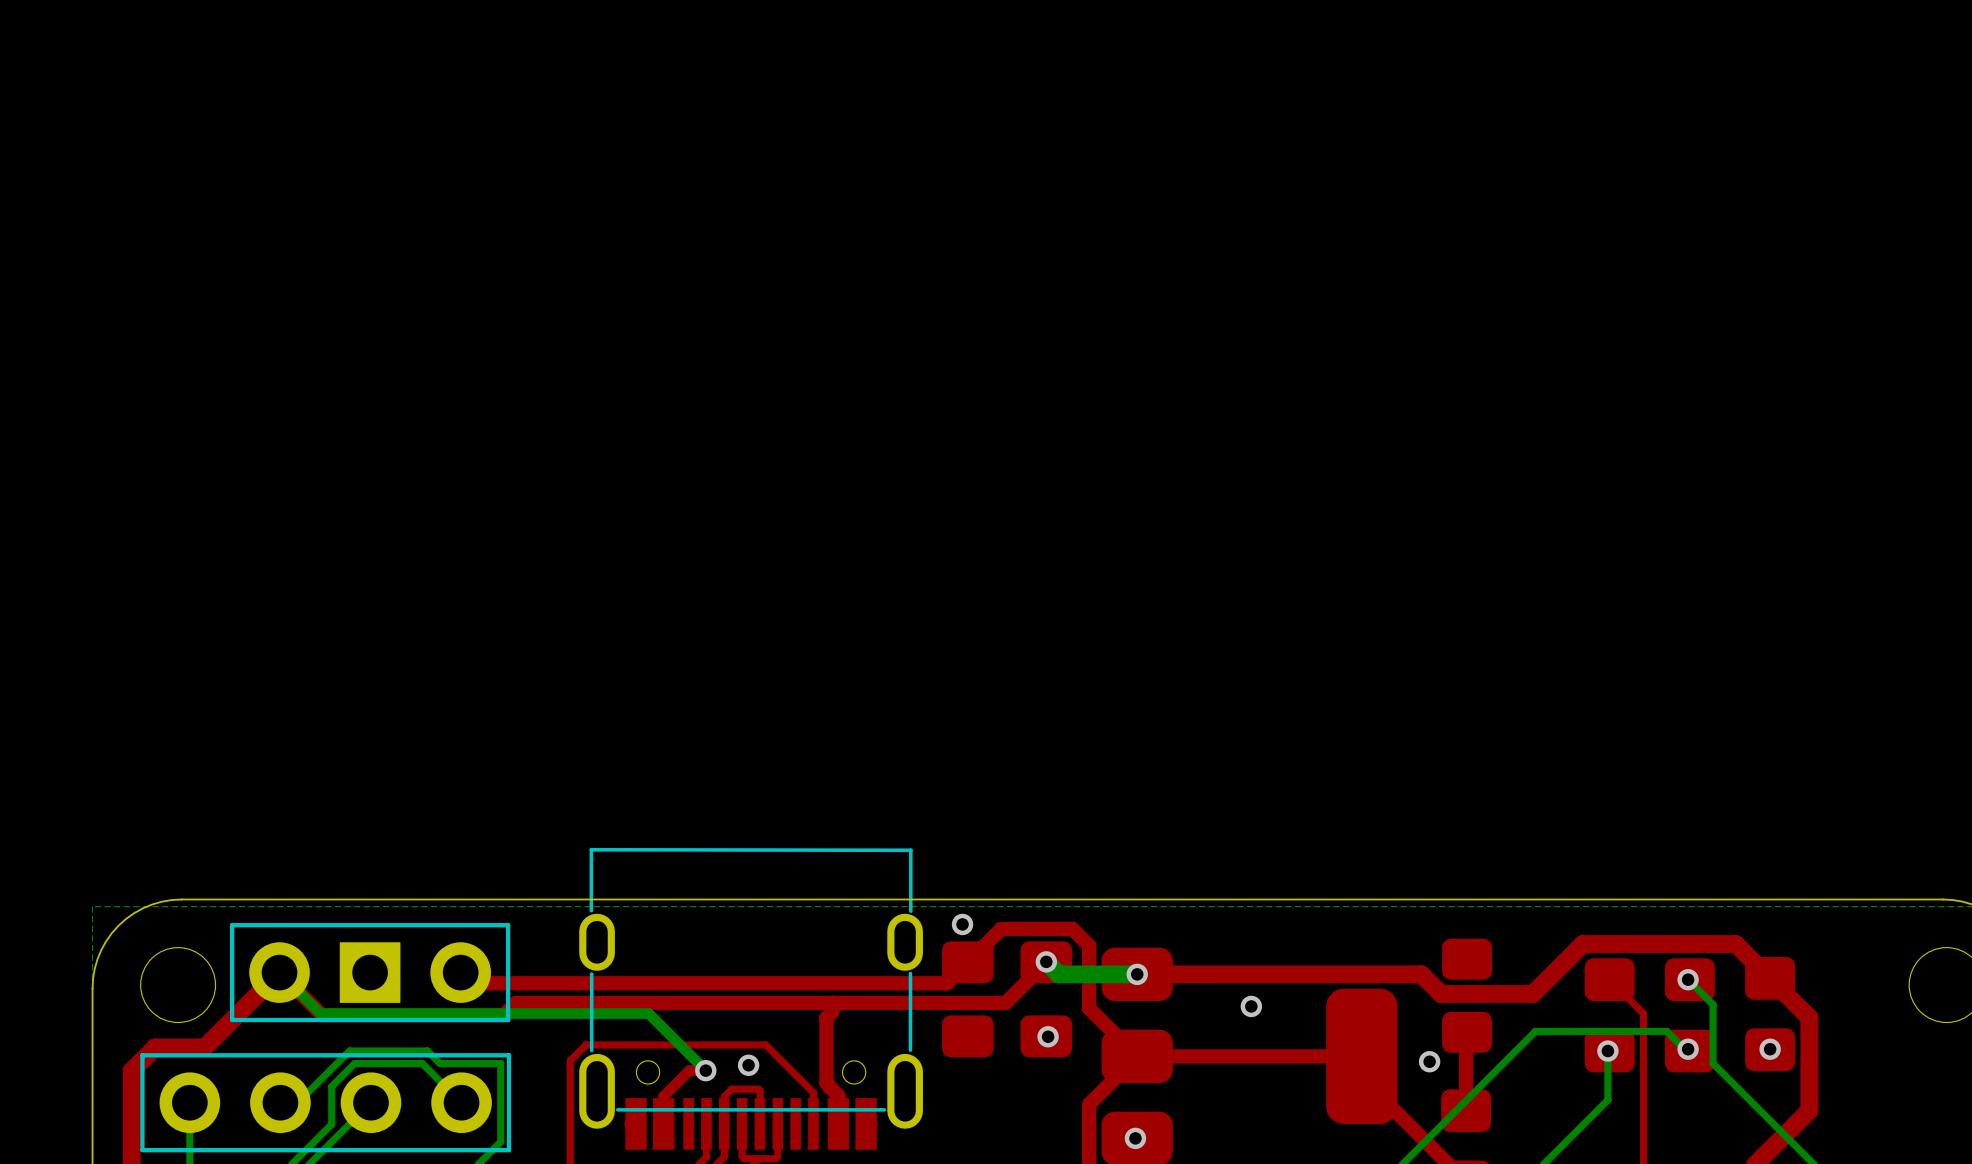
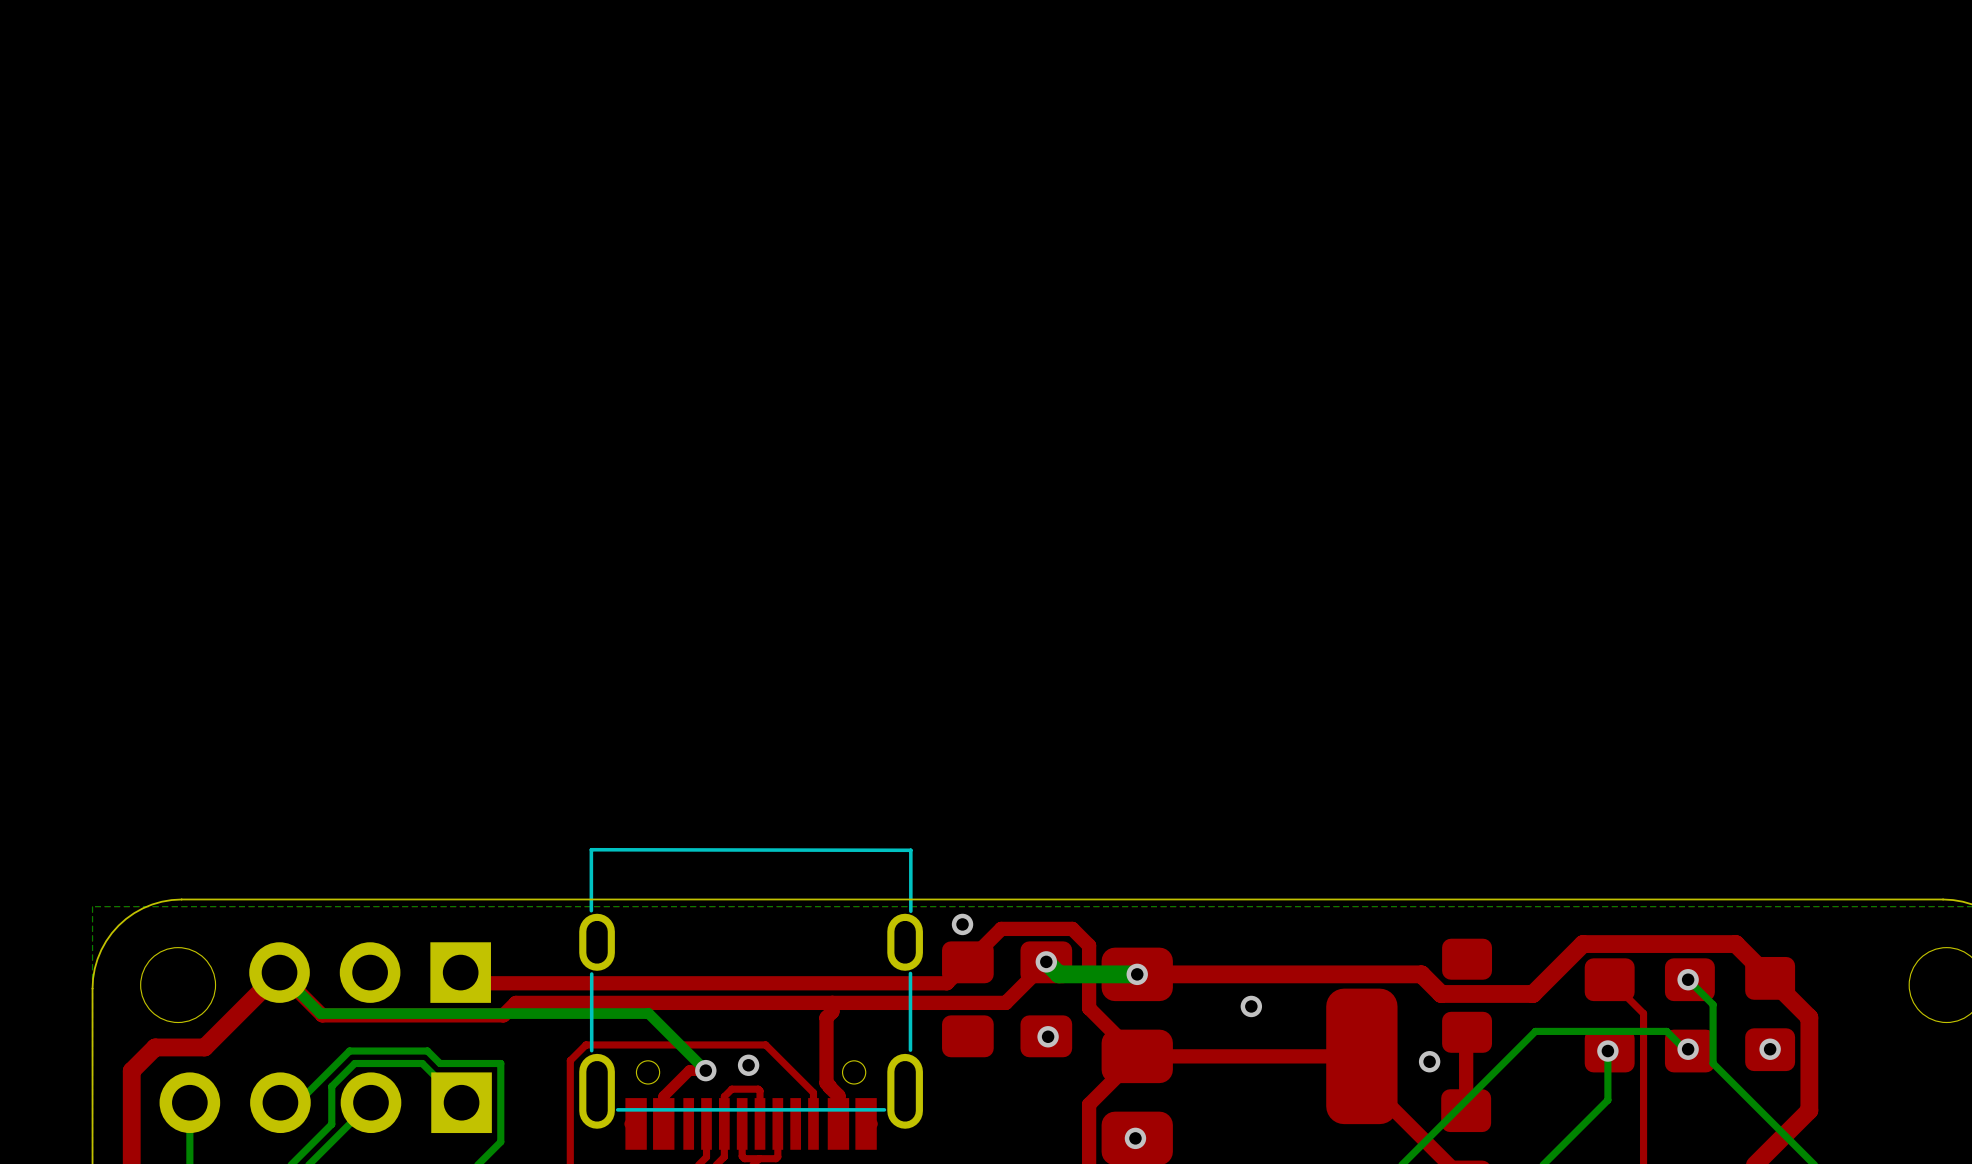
part footprint: [229, 923, 511, 1023] -> [249, 942, 491, 1003]
part footprint: [140, 1053, 512, 1153] -> [159, 1072, 492, 1134]

